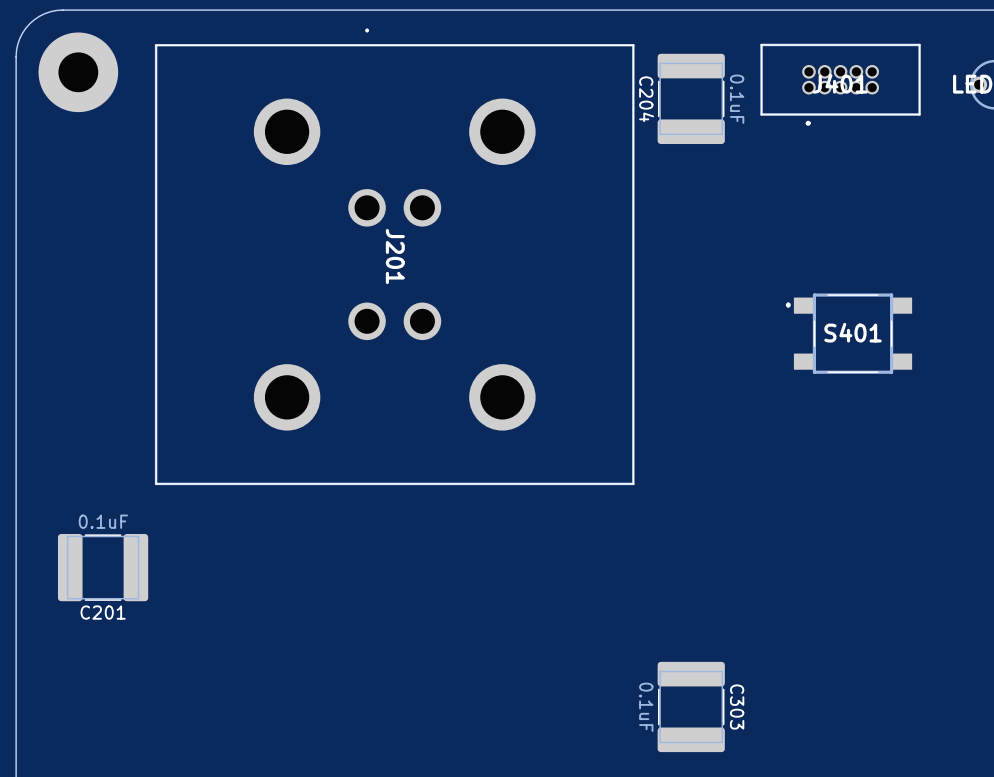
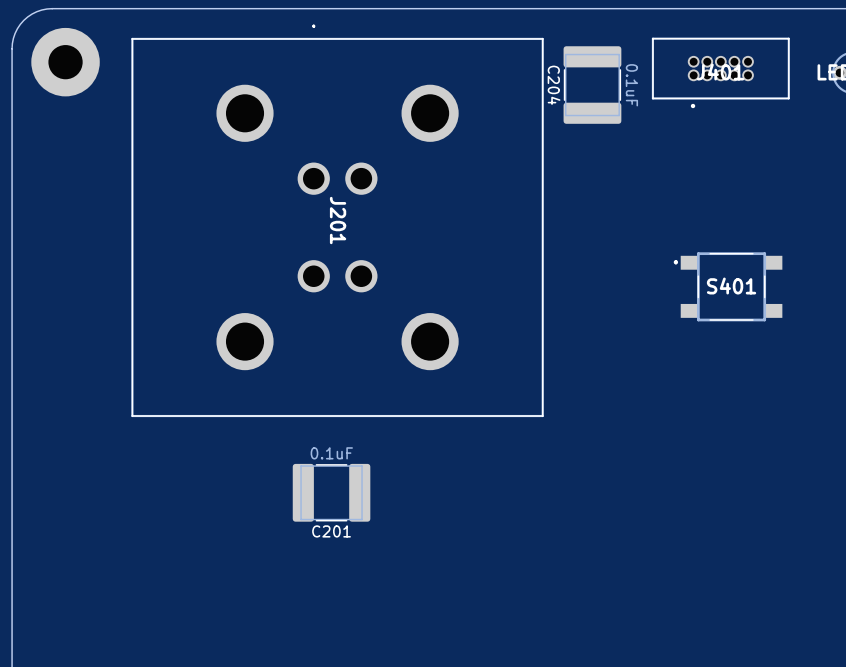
C201 position: (103, 567) -> (331, 492)
C303: 0.1uF (691, 706) -> none

